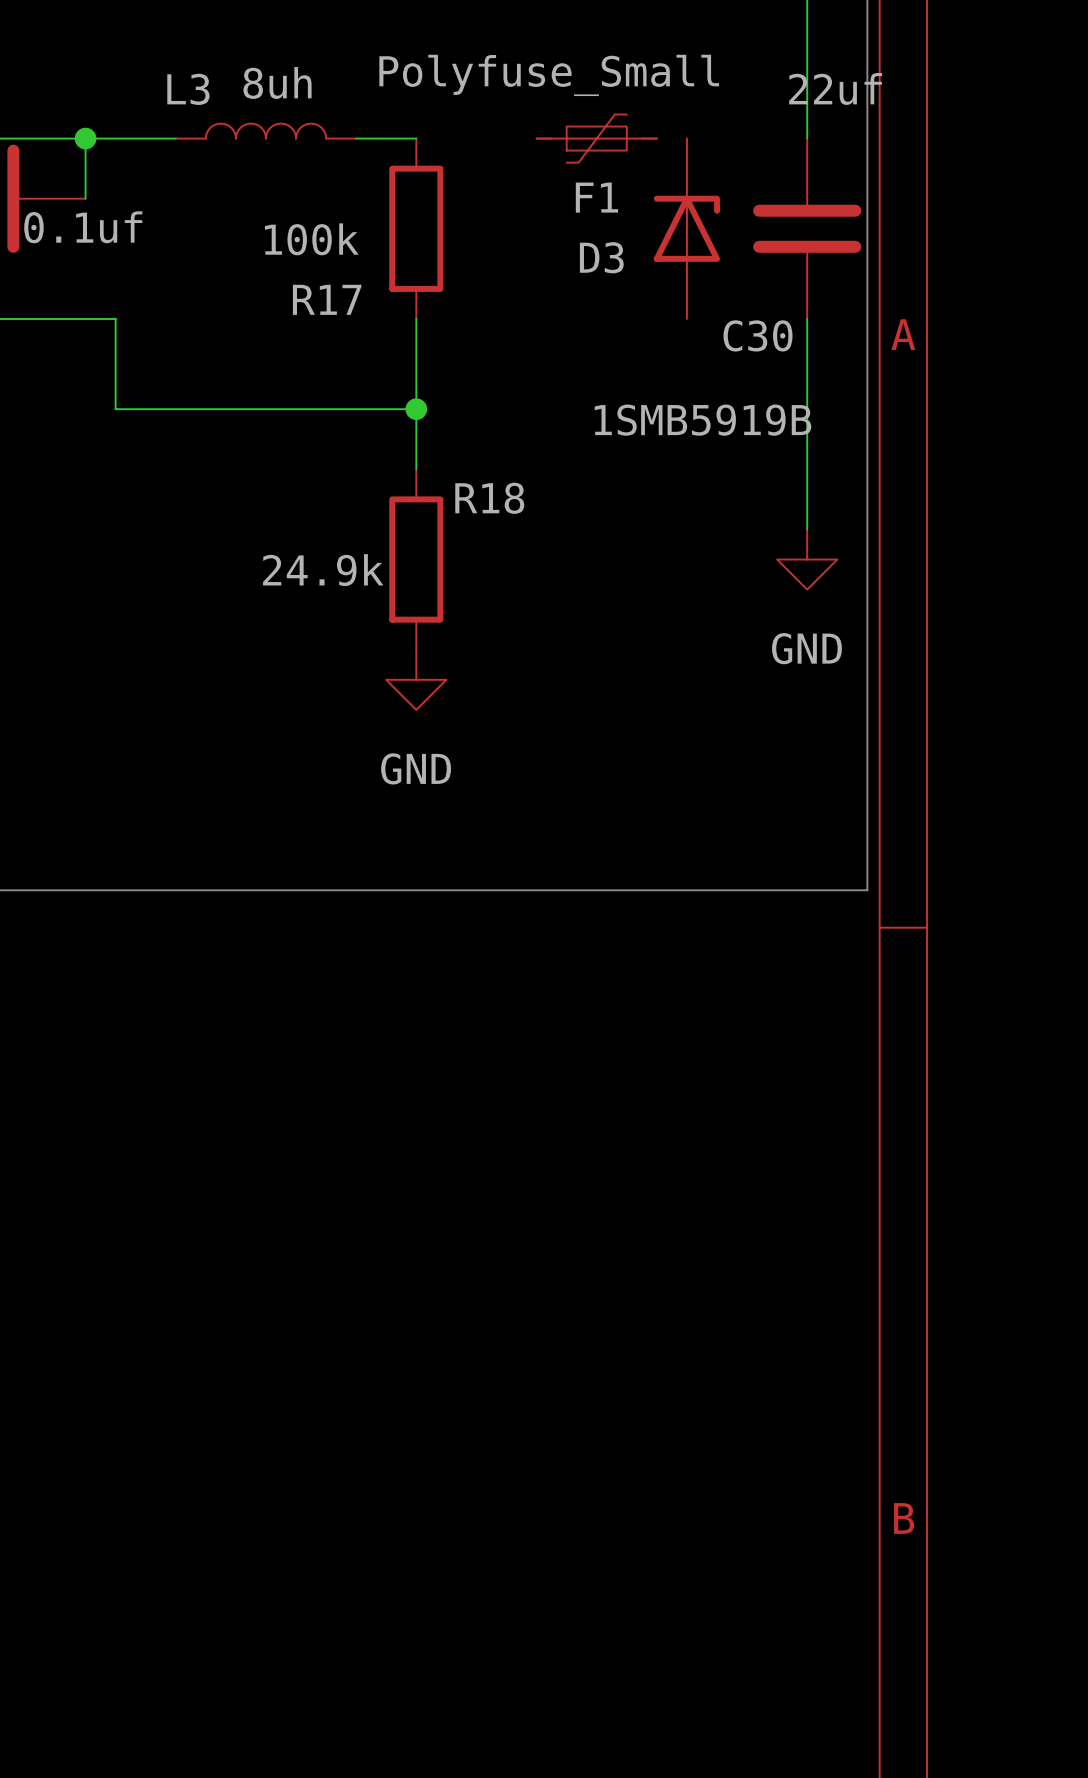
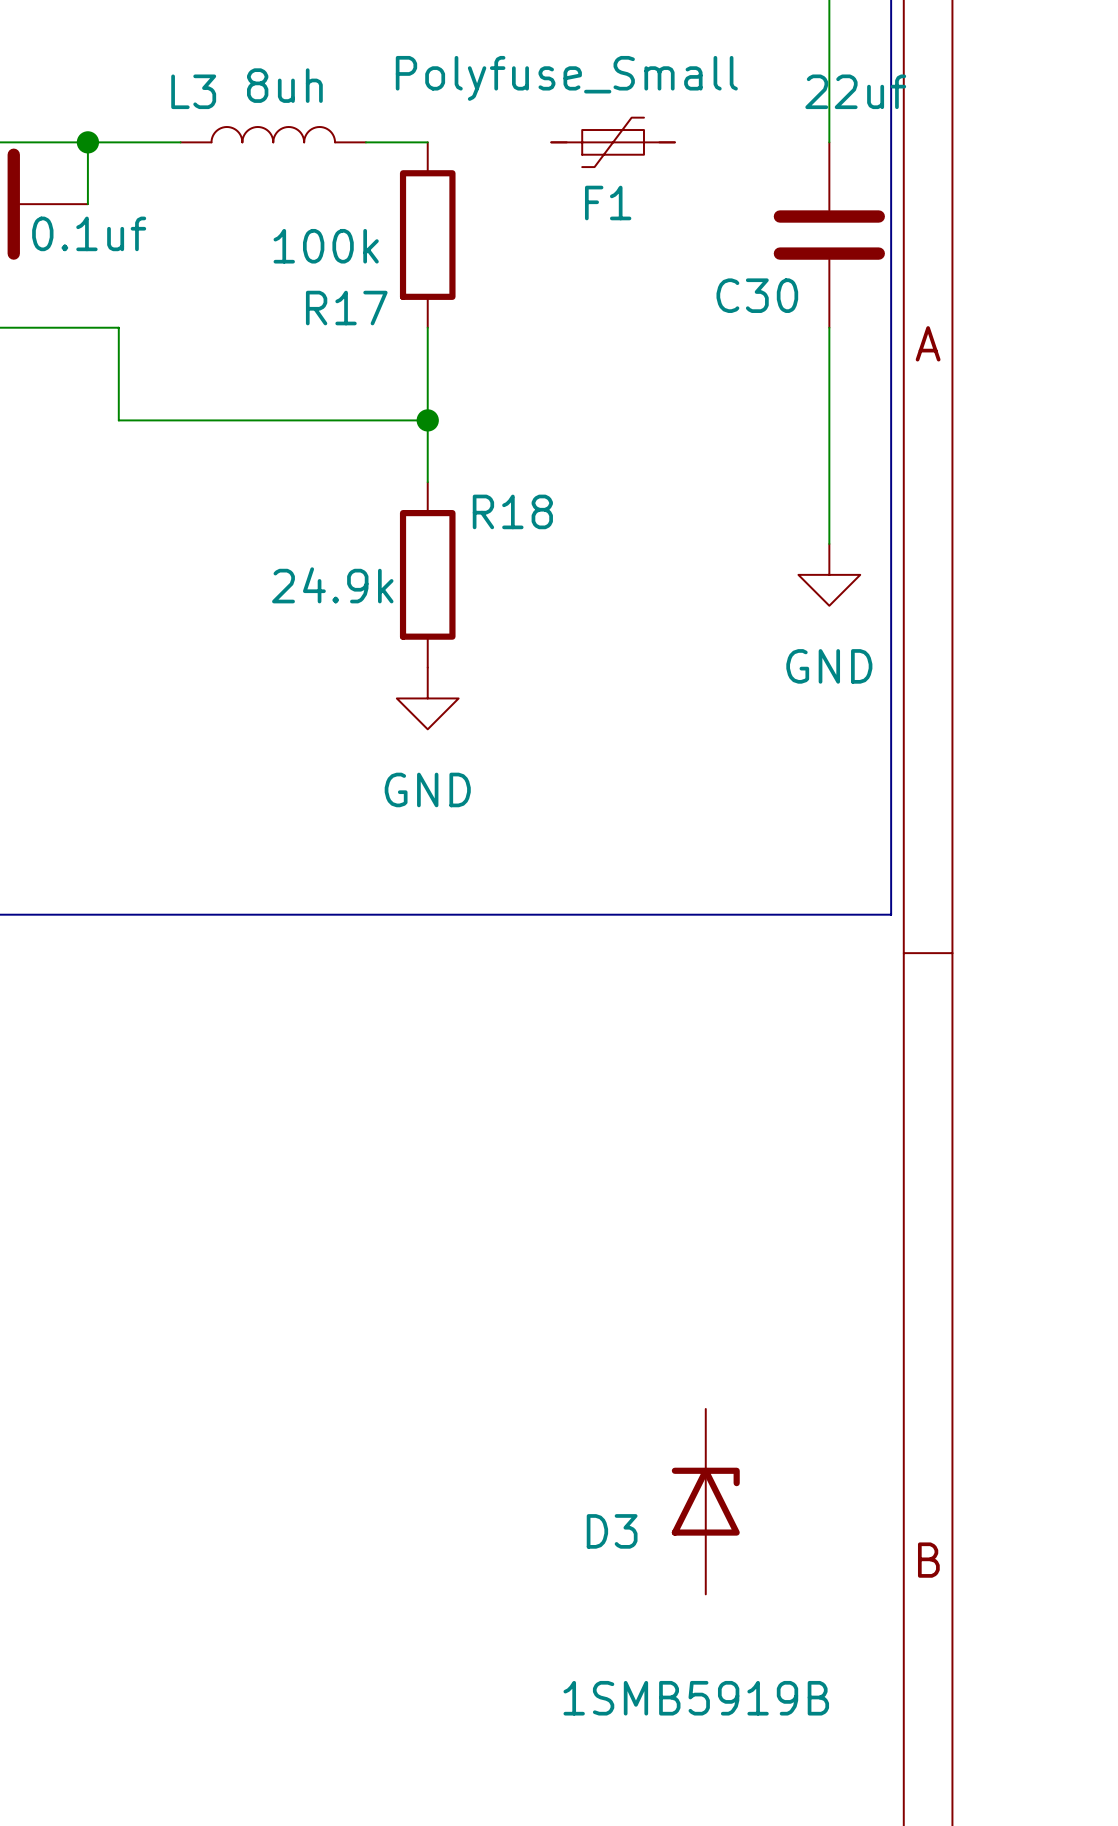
D3 position: (686, 228) -> (705, 1501)
C30 name position: C30 (758, 335) -> C30 (757, 295)

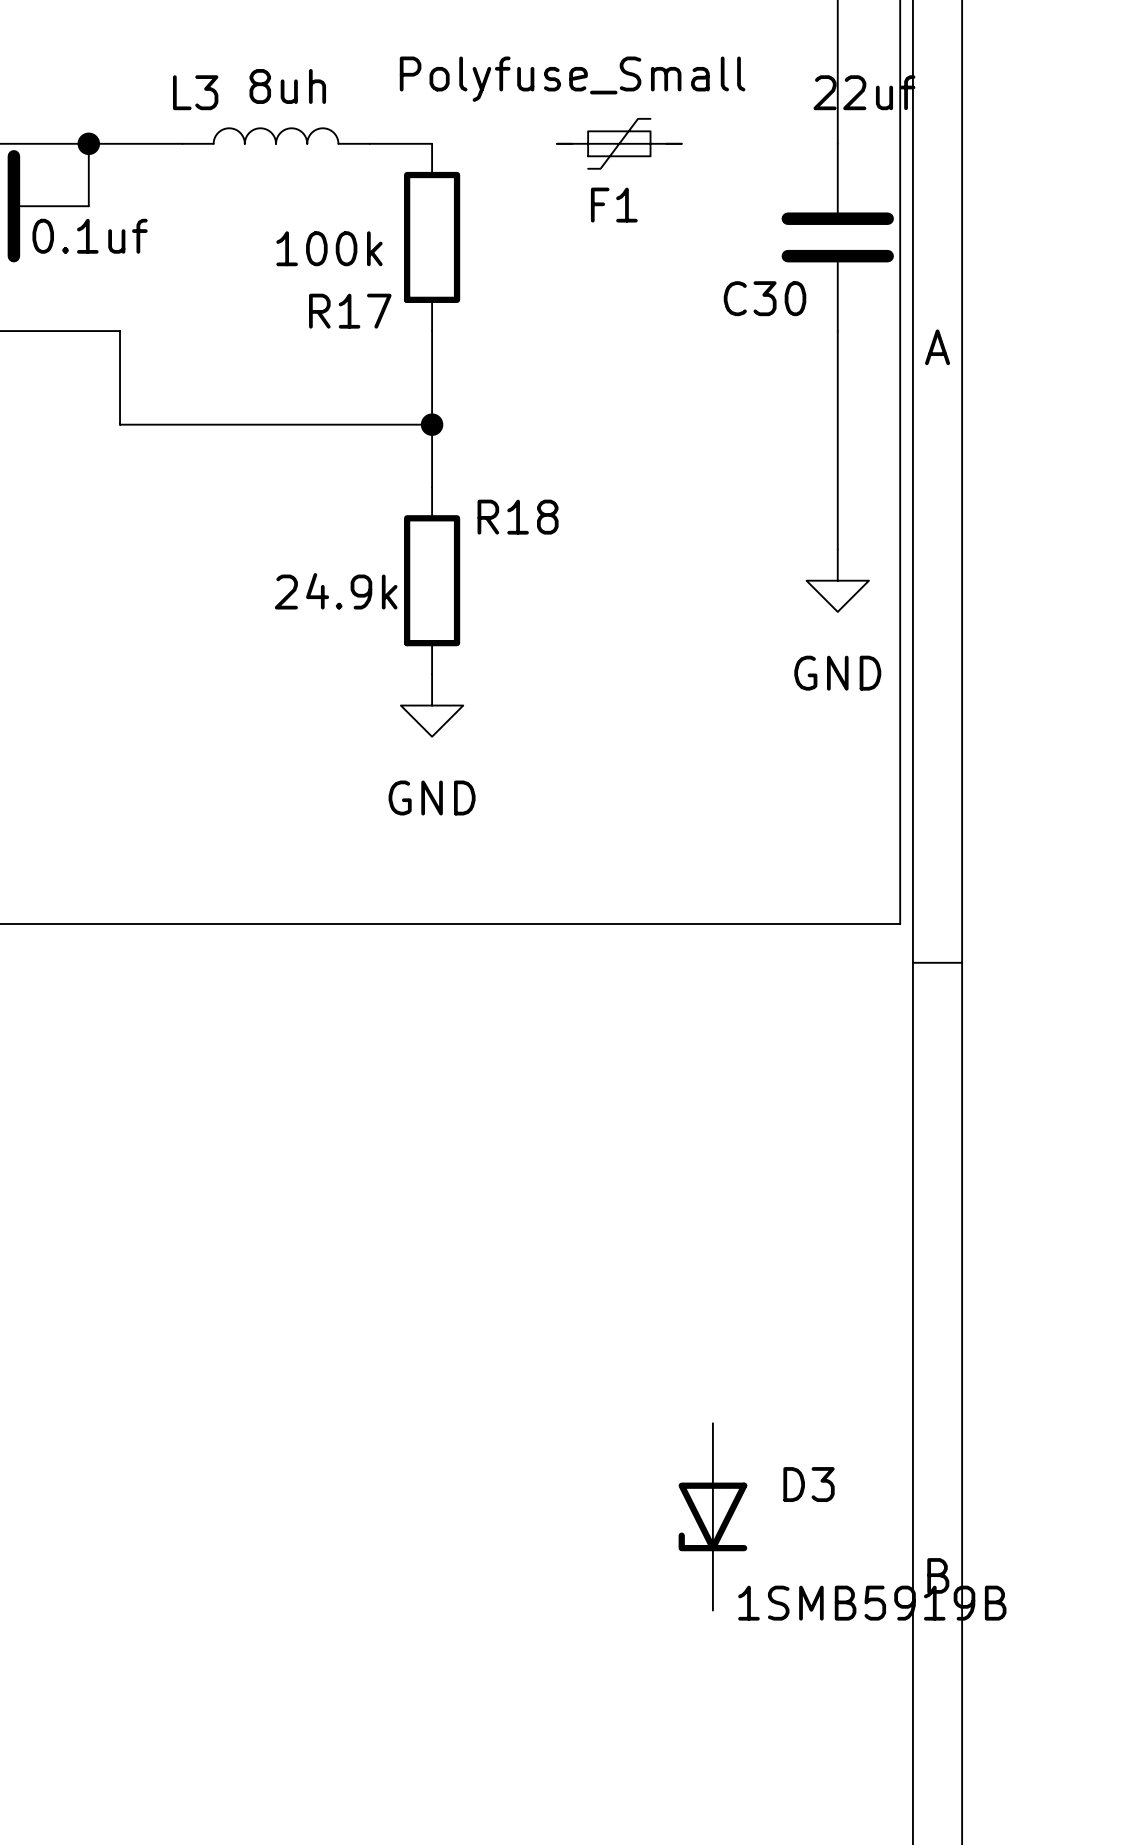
D3 rotation: 0° (705, 1501) -> 180° (712, 1516)
D3 value position: 1SMB5919B (696, 1698) -> 1SMB5919B (872, 1603)

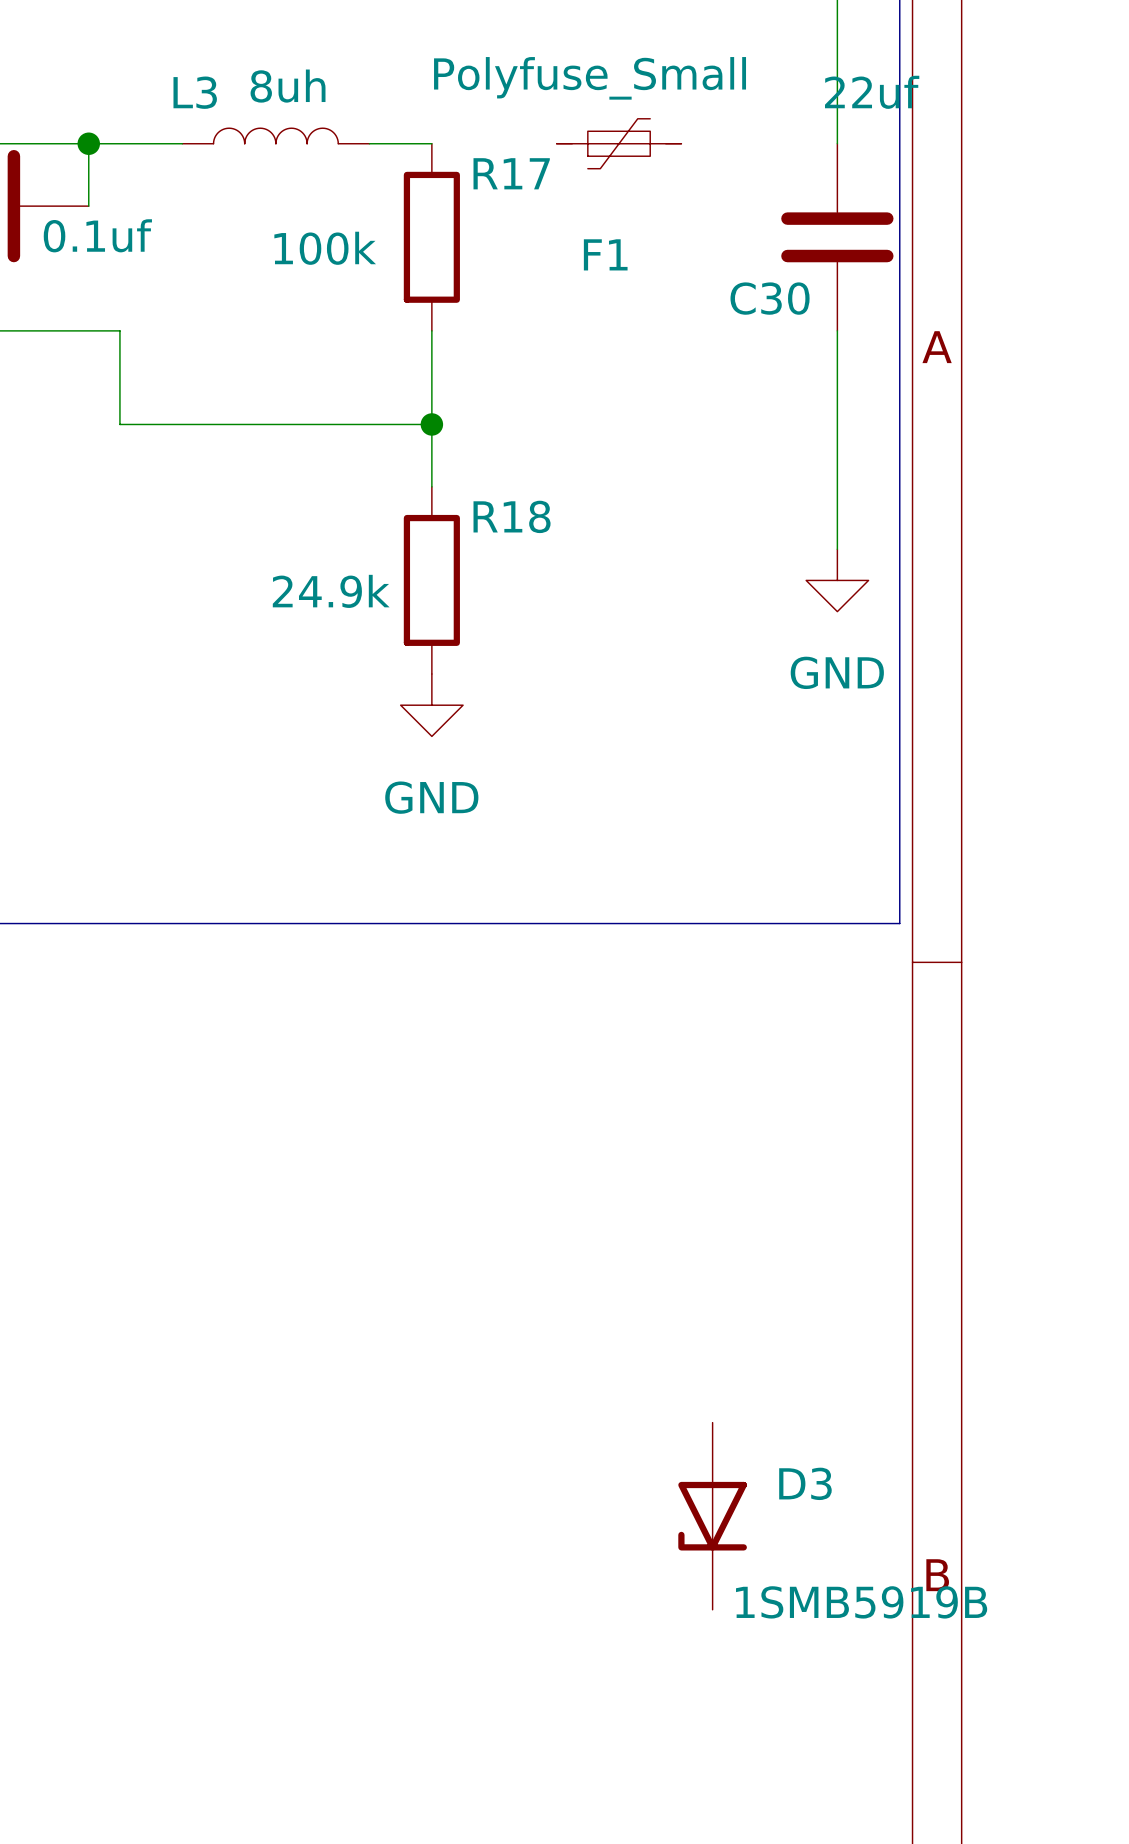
F1 name position: F1 (614, 205) -> F1 (605, 254)
R17 name position: R17 (350, 311) -> R17 (511, 173)

